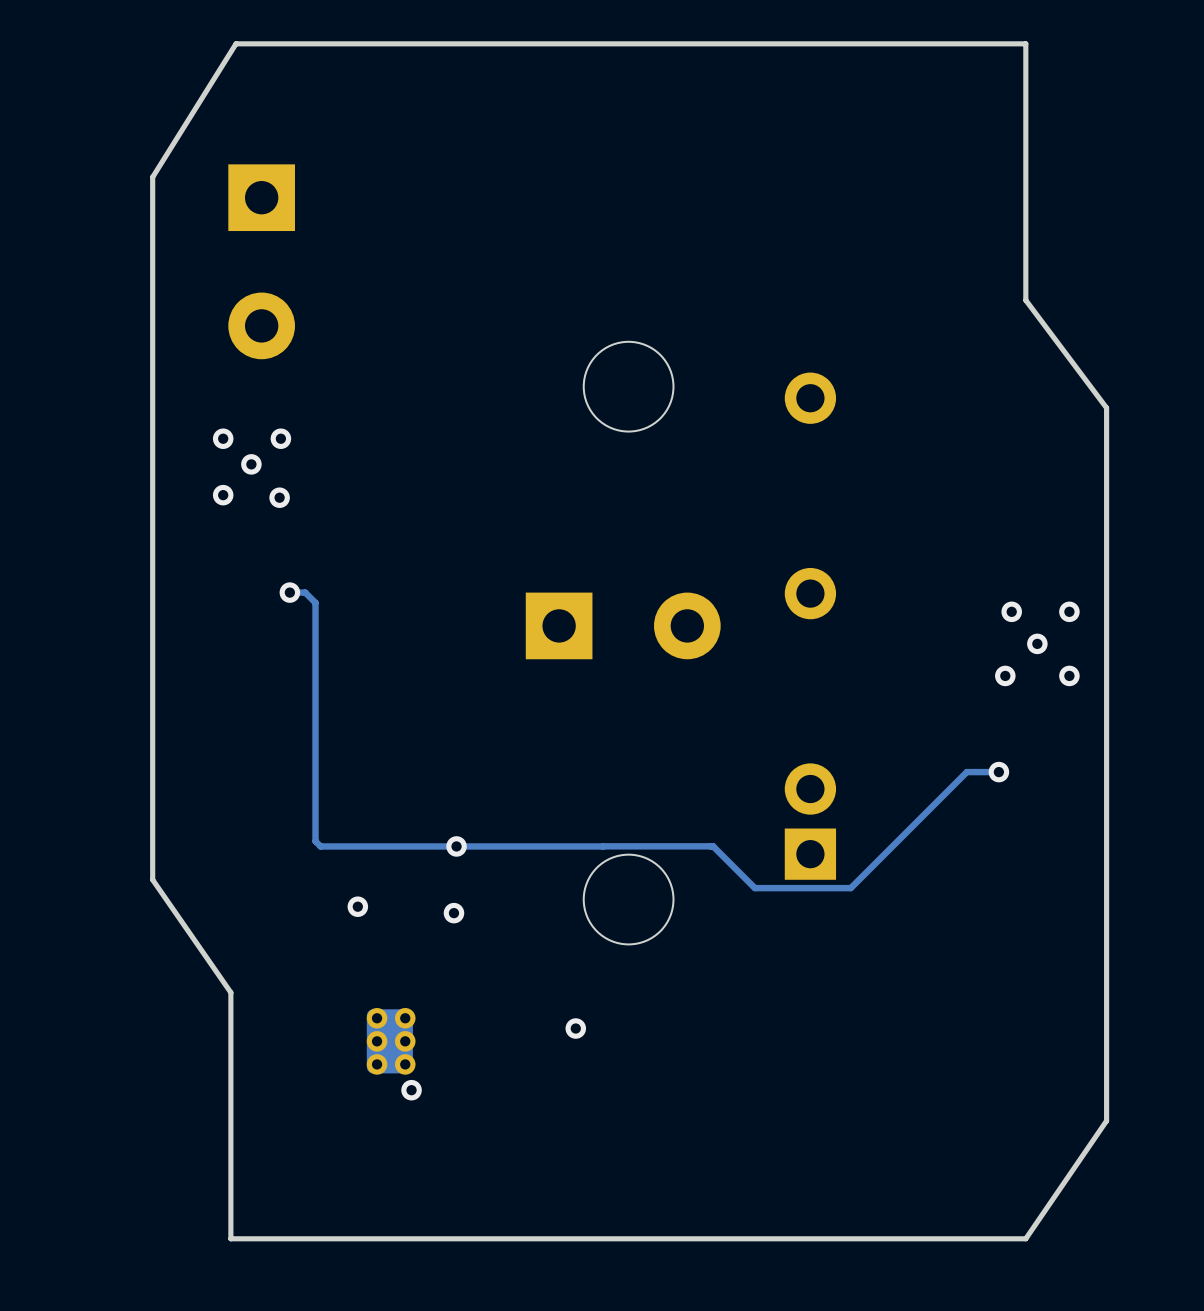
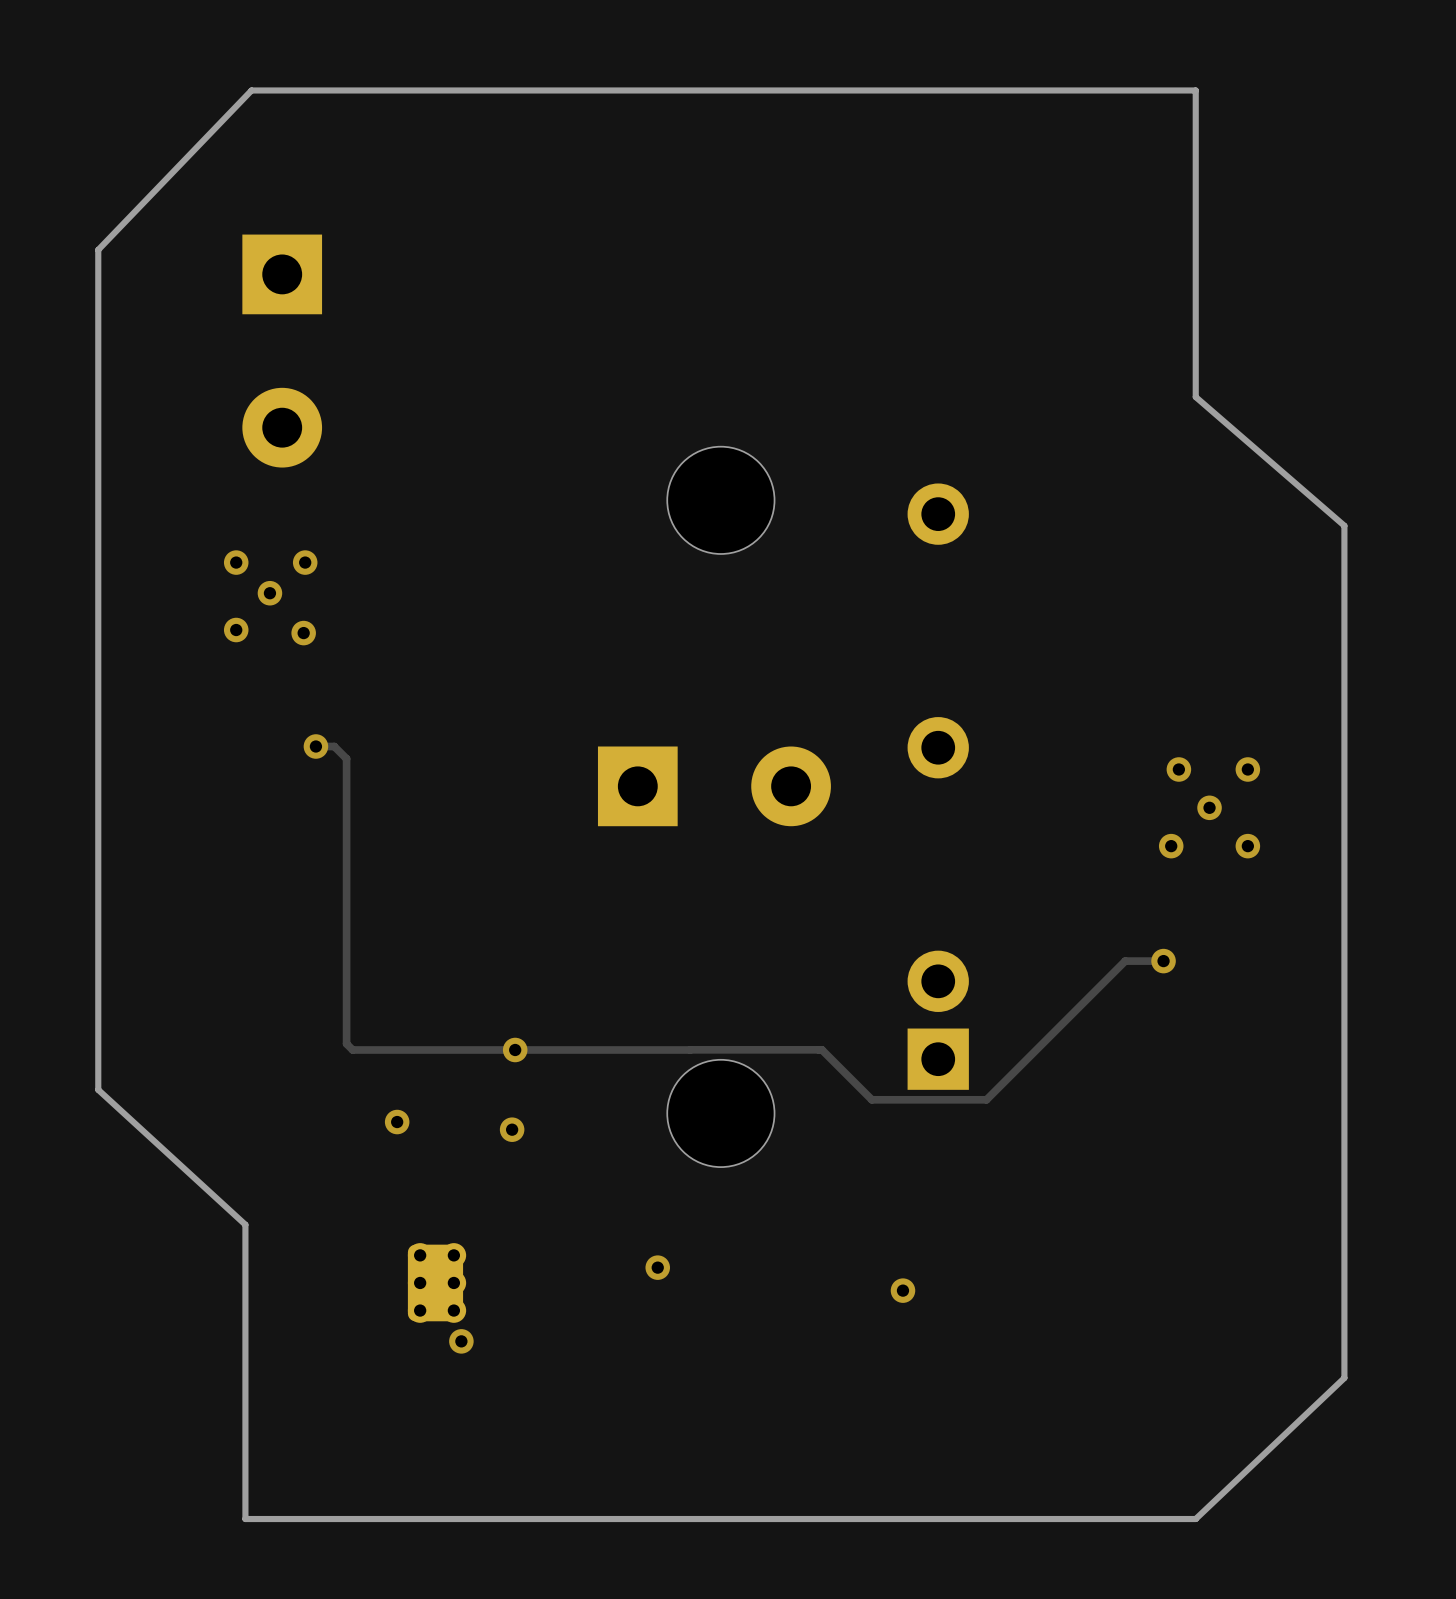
board edge: (236, 43) (152, 177) (152, 879) (230, 992) -> (251, 90) (98, 249) (98, 1089) (245, 1224)
board edge: (1025, 300) (1106, 407) (1106, 1120) (1025, 1238) -> (1195, 397) (1344, 525) (1344, 1378) (1195, 1519)
via: none -> (902, 1290)

